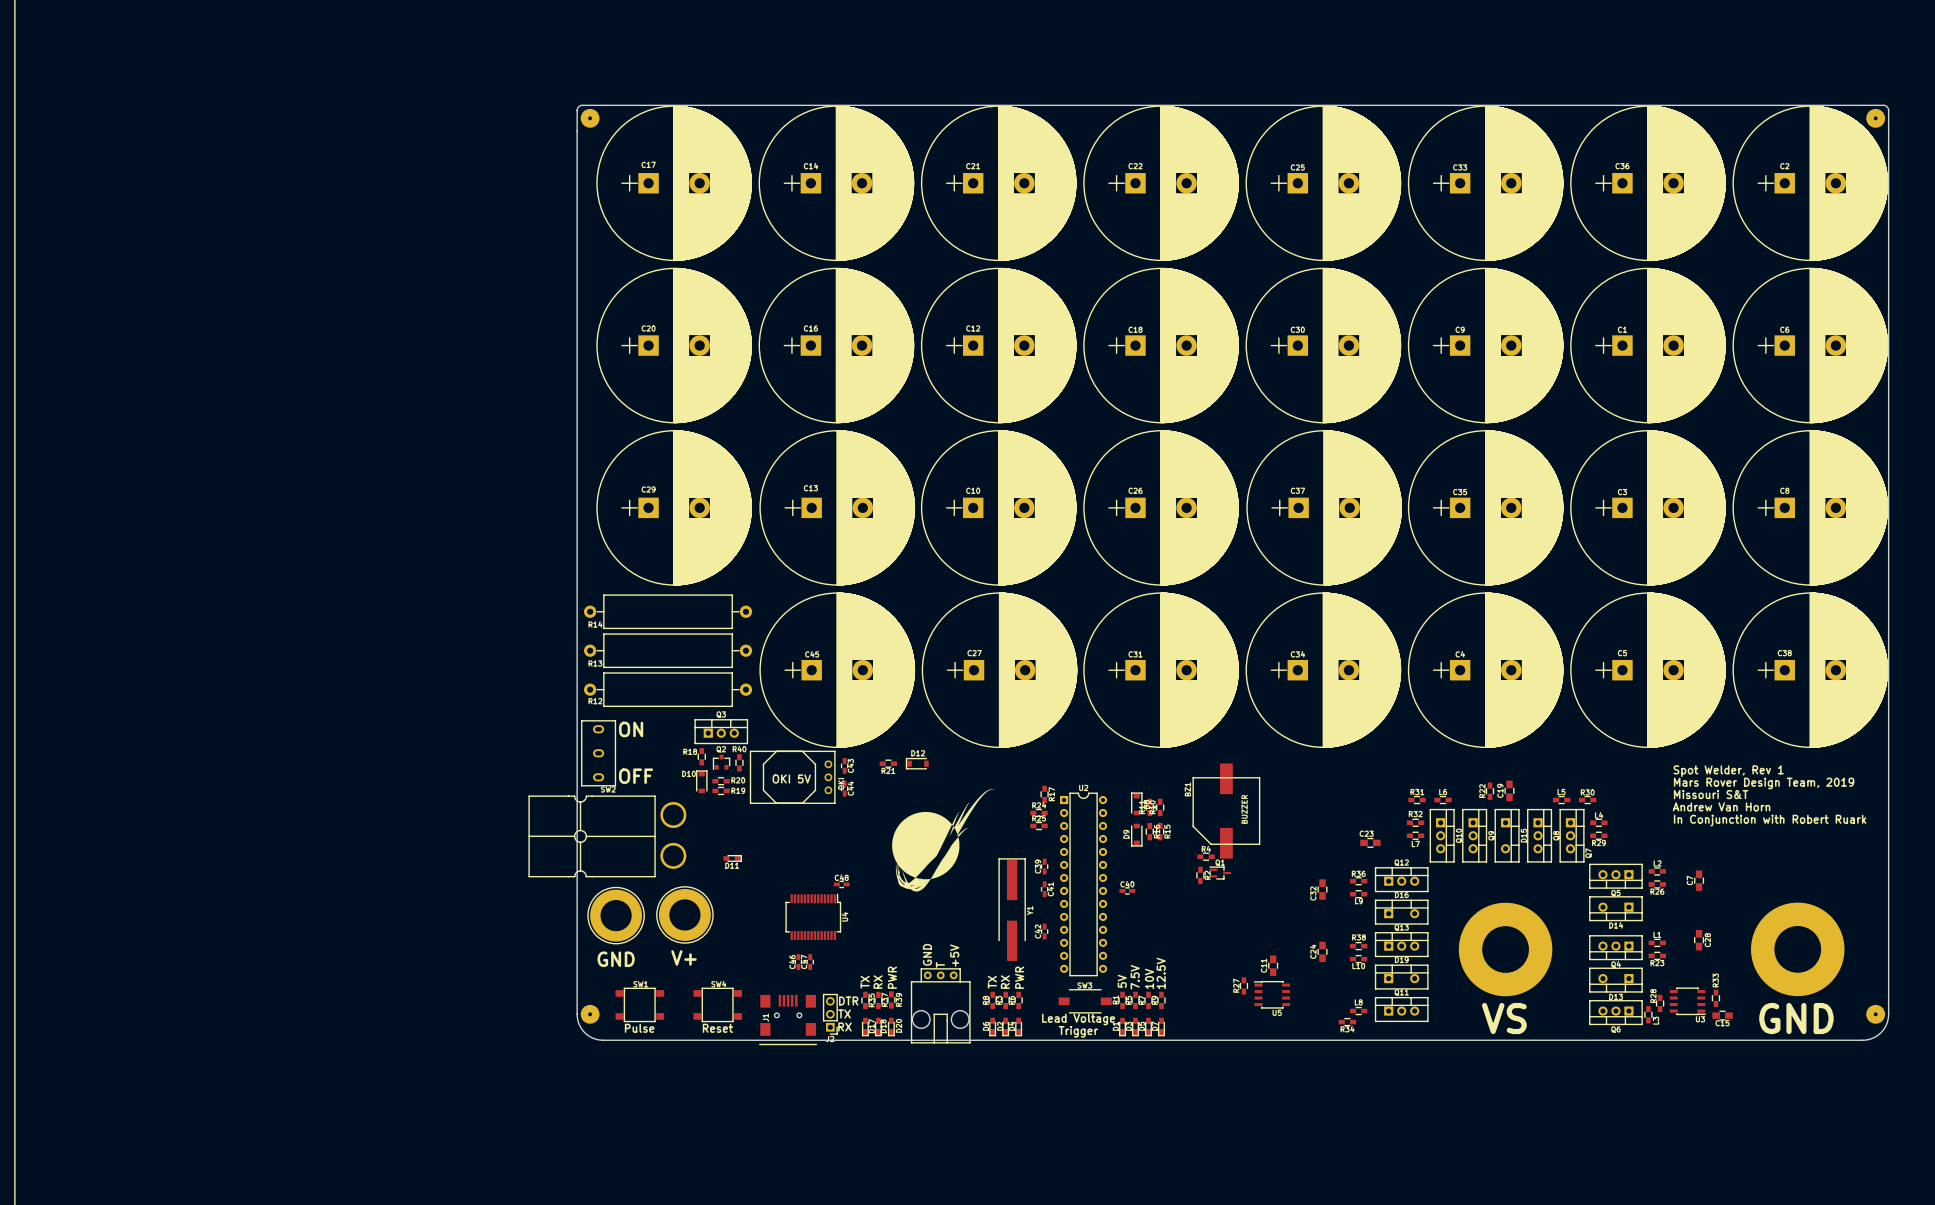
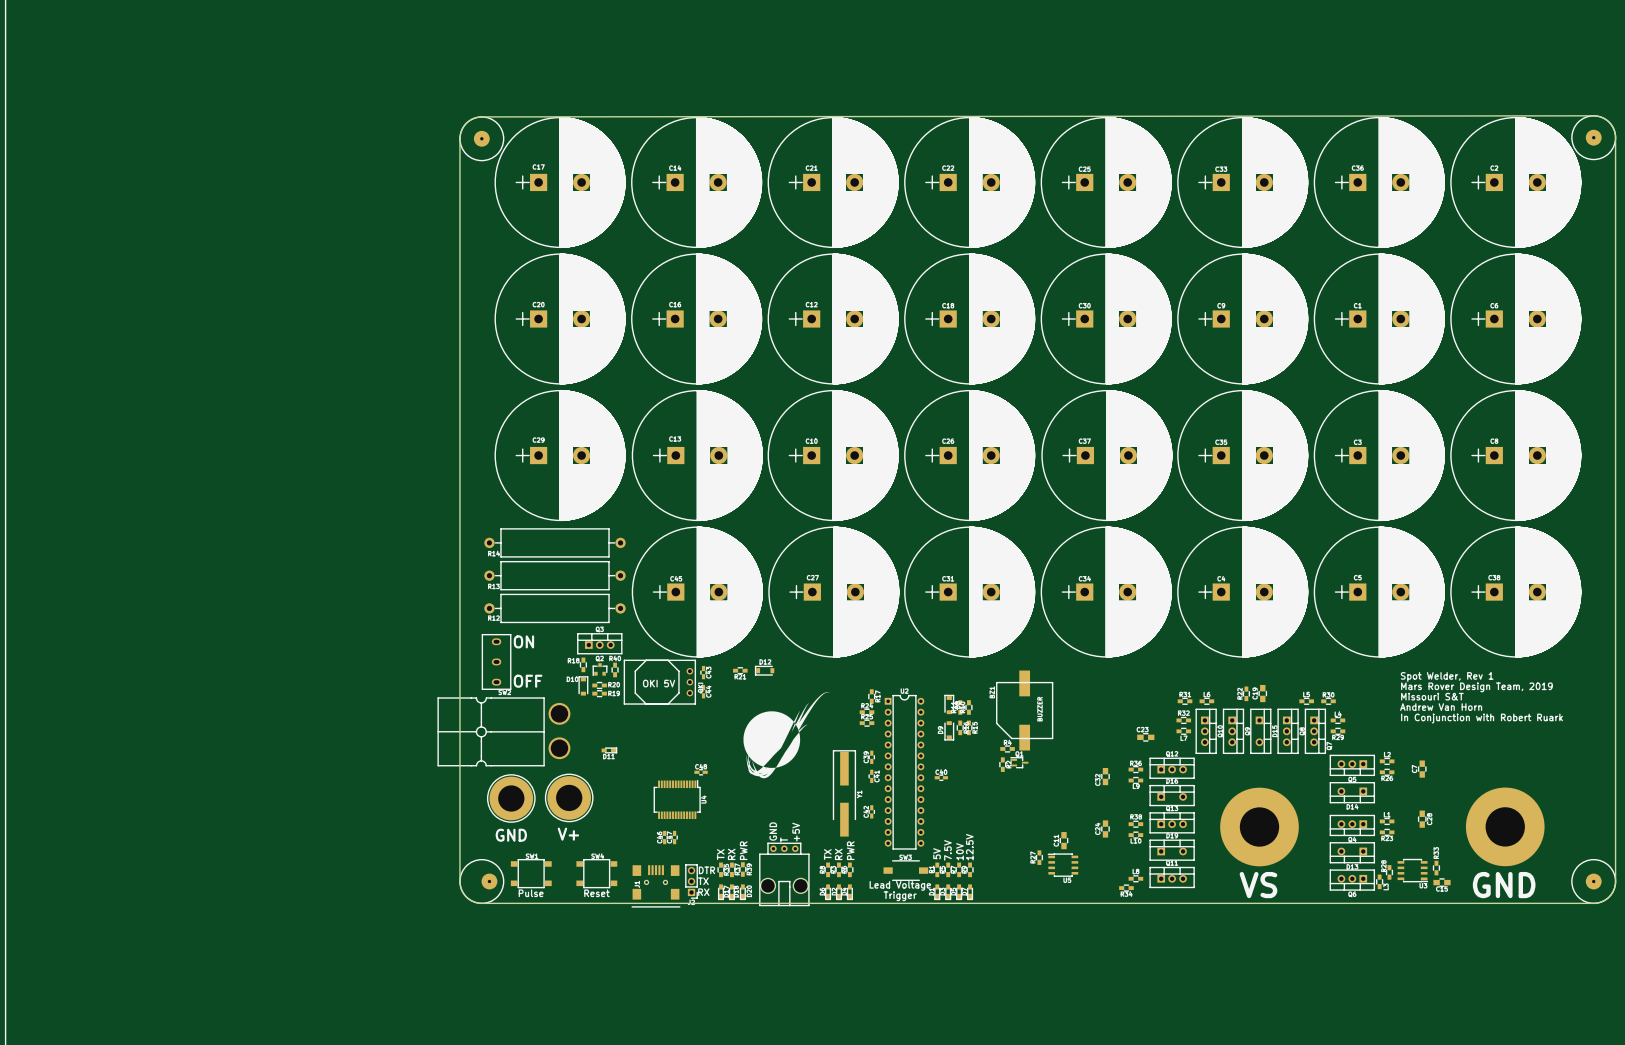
drawing: none -> [1571, 115, 1617, 160]
drawing: none -> [459, 116, 505, 162]
part position: (590, 118) -> (481, 138)
part position: (1875, 118) -> (1593, 137)
drawing: none -> [459, 859, 505, 904]
drawing: none -> [1571, 859, 1617, 904]
part position: (1875, 1014) -> (1593, 881)
board edge: (603, 1040) (591, 1037) (584, 1032) (579, 1025) (577, 1014) (577, 110) (578, 106) (582, 105) (1886, 106) (1888, 110) (1888, 1014) (1886, 1025) (1881, 1032) (1873, 1037) (1862, 1040) -> (500, 903) (472, 901) (463, 893) (459, 881) (459, 138) (462, 129) (468, 121) (481, 116) (1593, 115) (1603, 118) (1609, 122) (1613, 128) (1615, 137) (1615, 881) (1612, 893) (1600, 902) (1559, 903)

